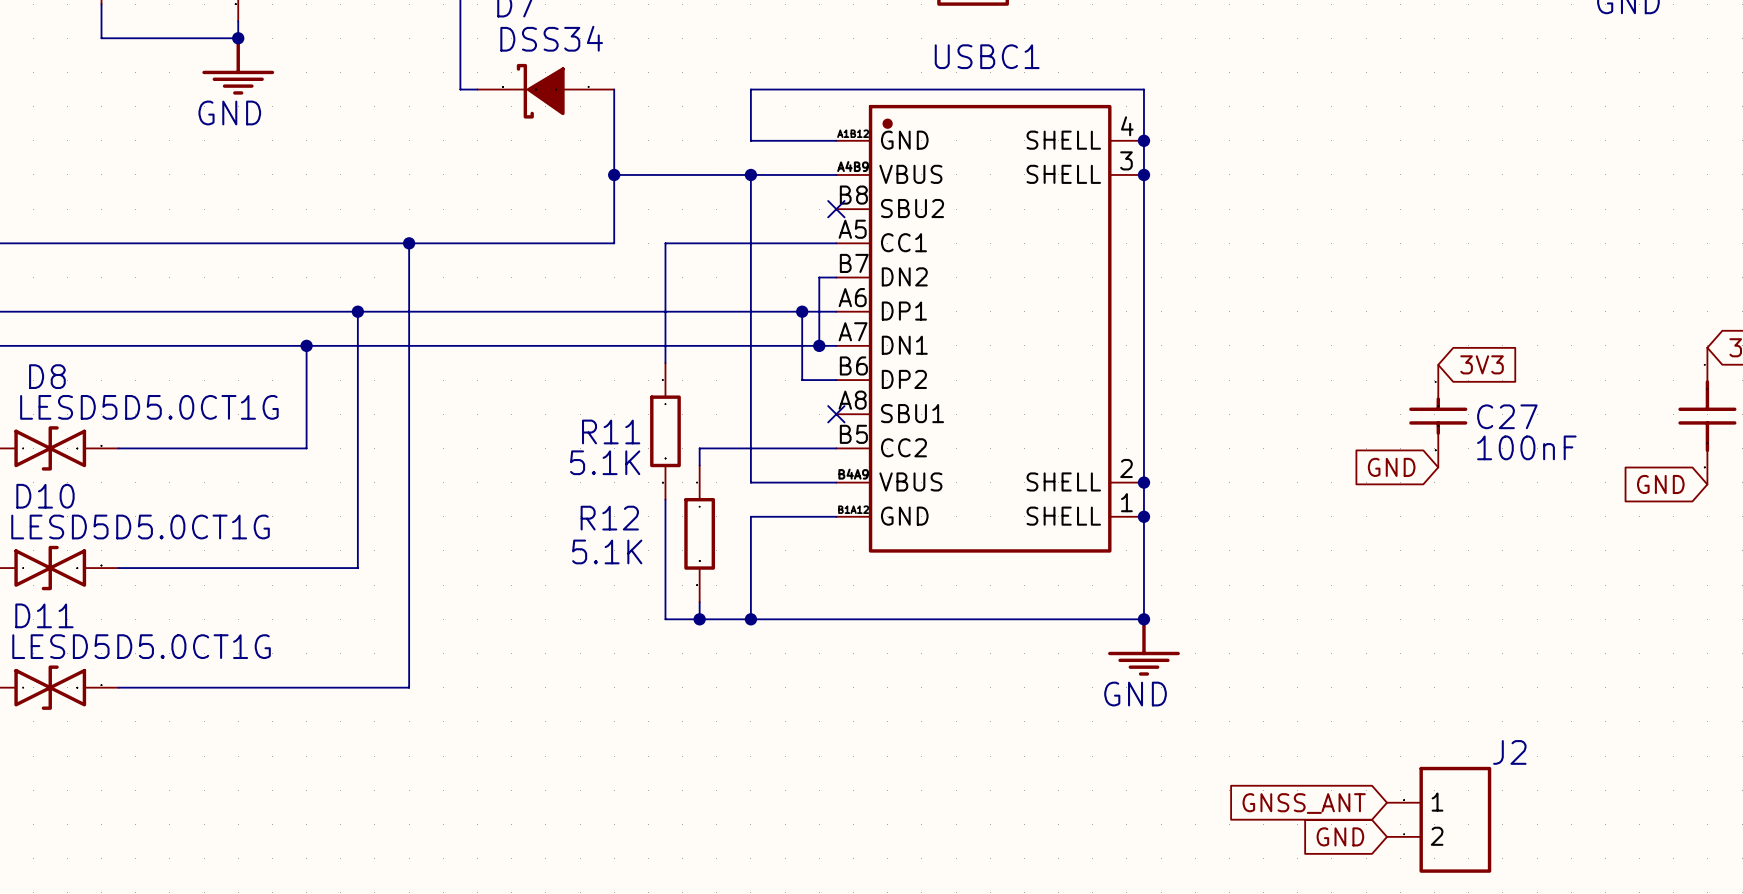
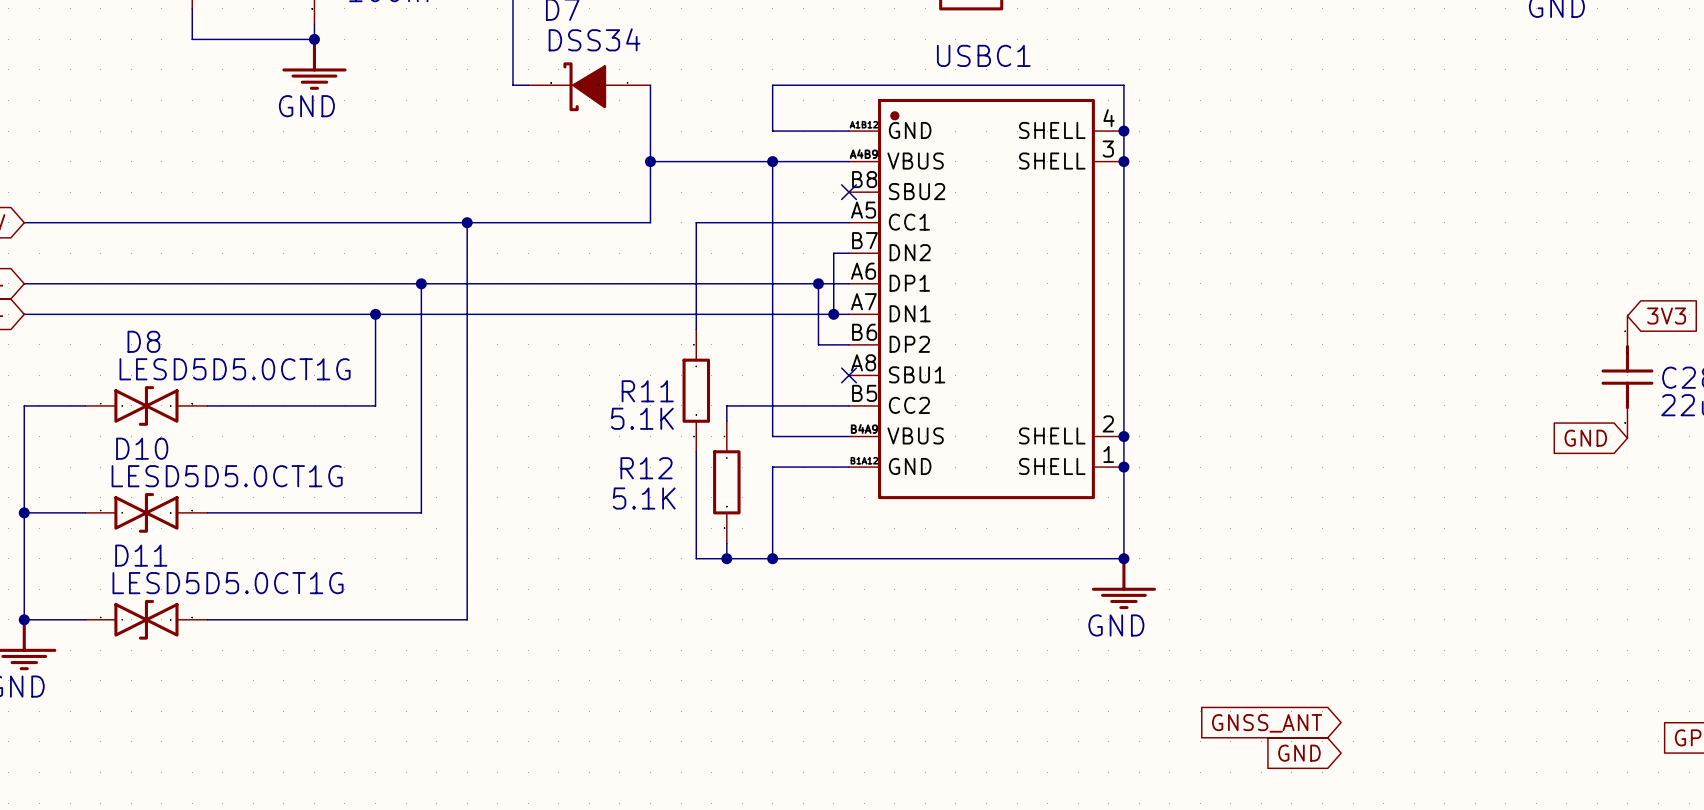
global label: 3V3 (1482, 364) -> none
C27: 100nF (1438, 416) -> none
global label: GND (1391, 467) -> none
J2: (1439, 819) -> none

